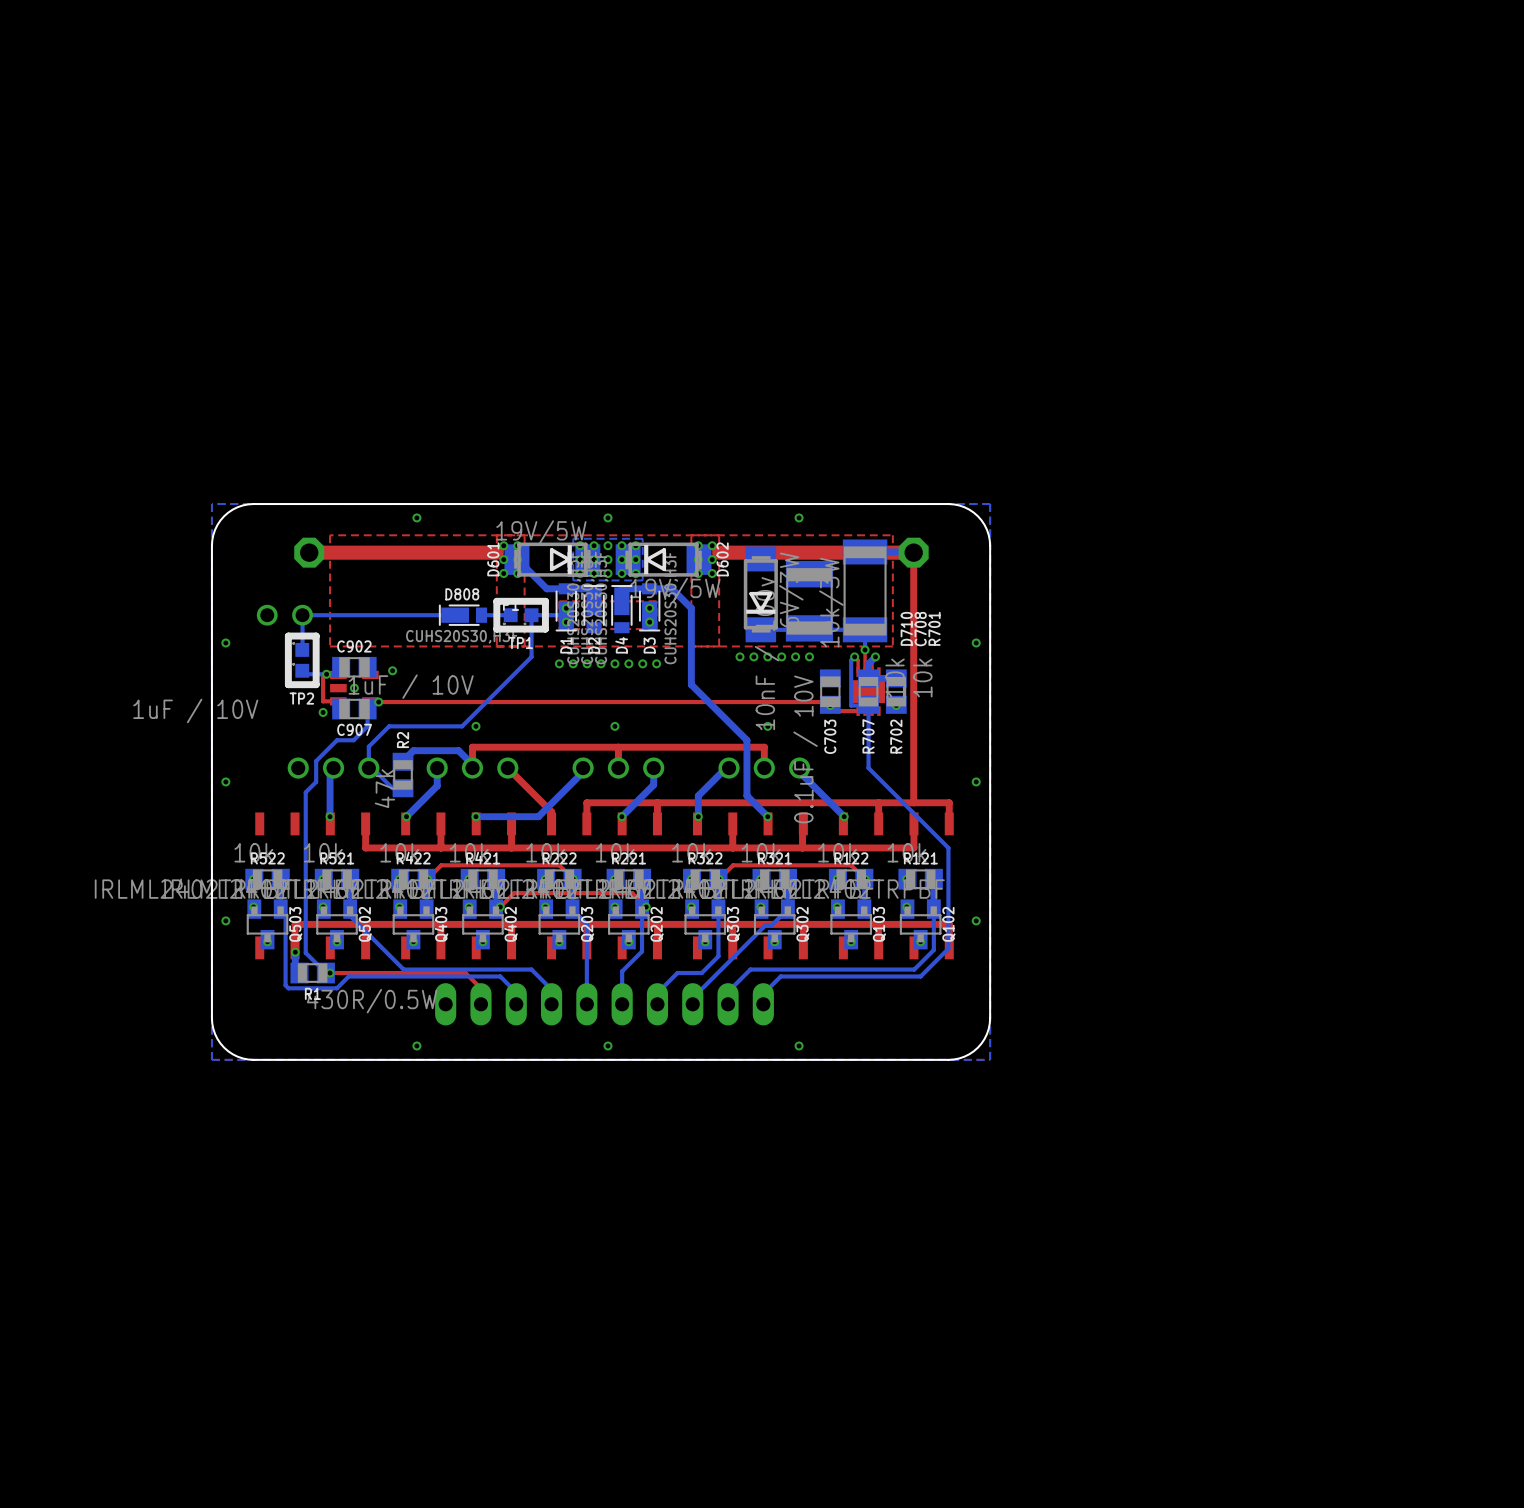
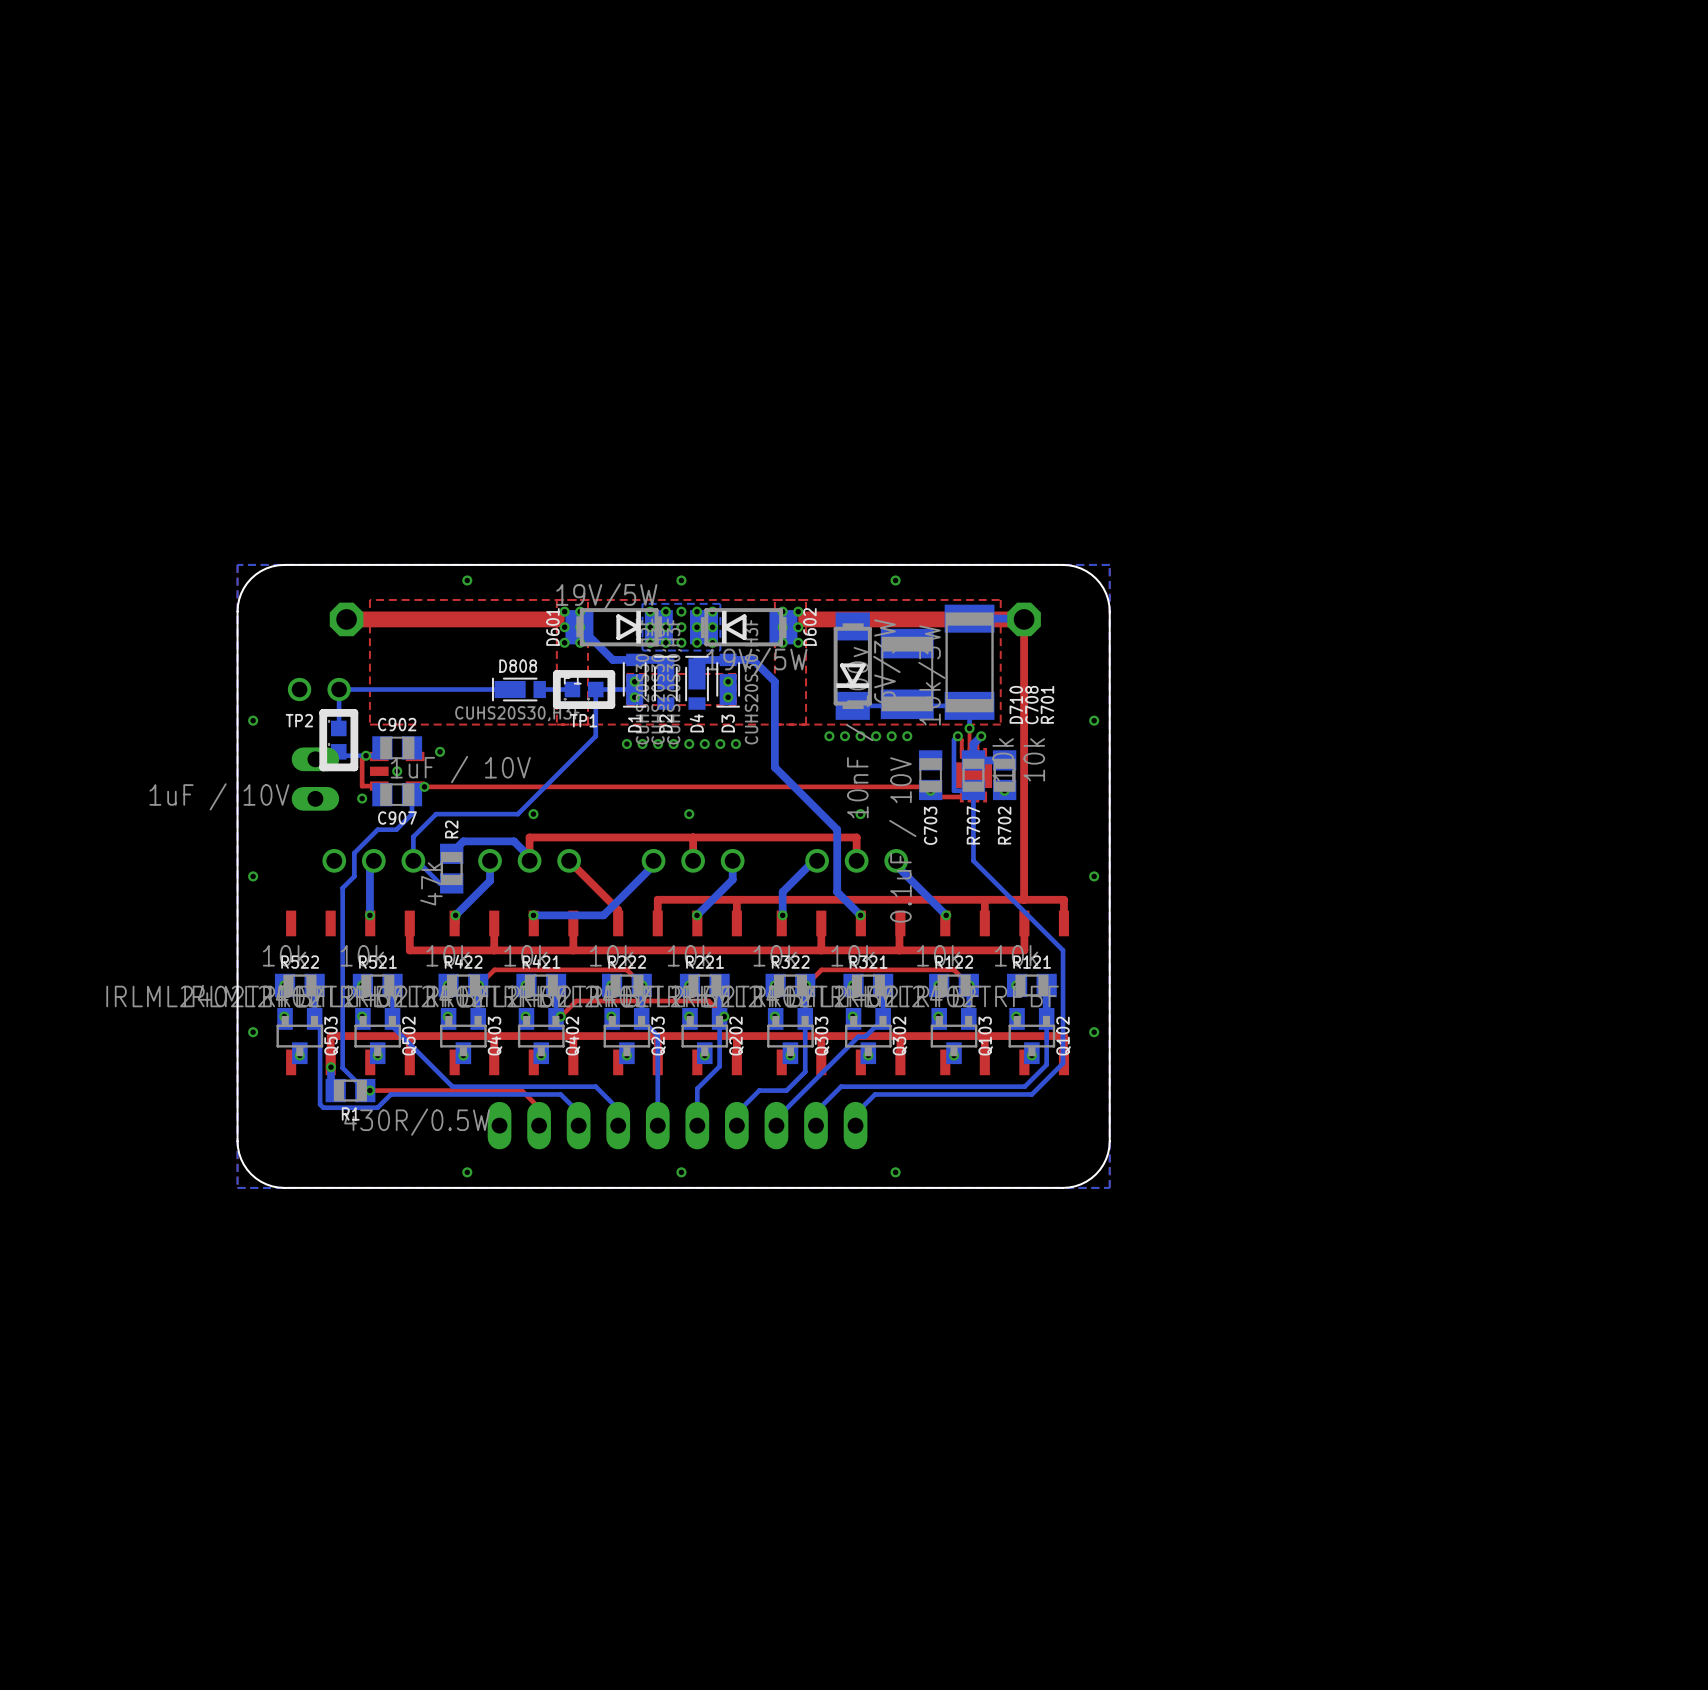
part: none -> (315, 779)
text position: TP2 (301, 698) -> TP2 (299, 720)

